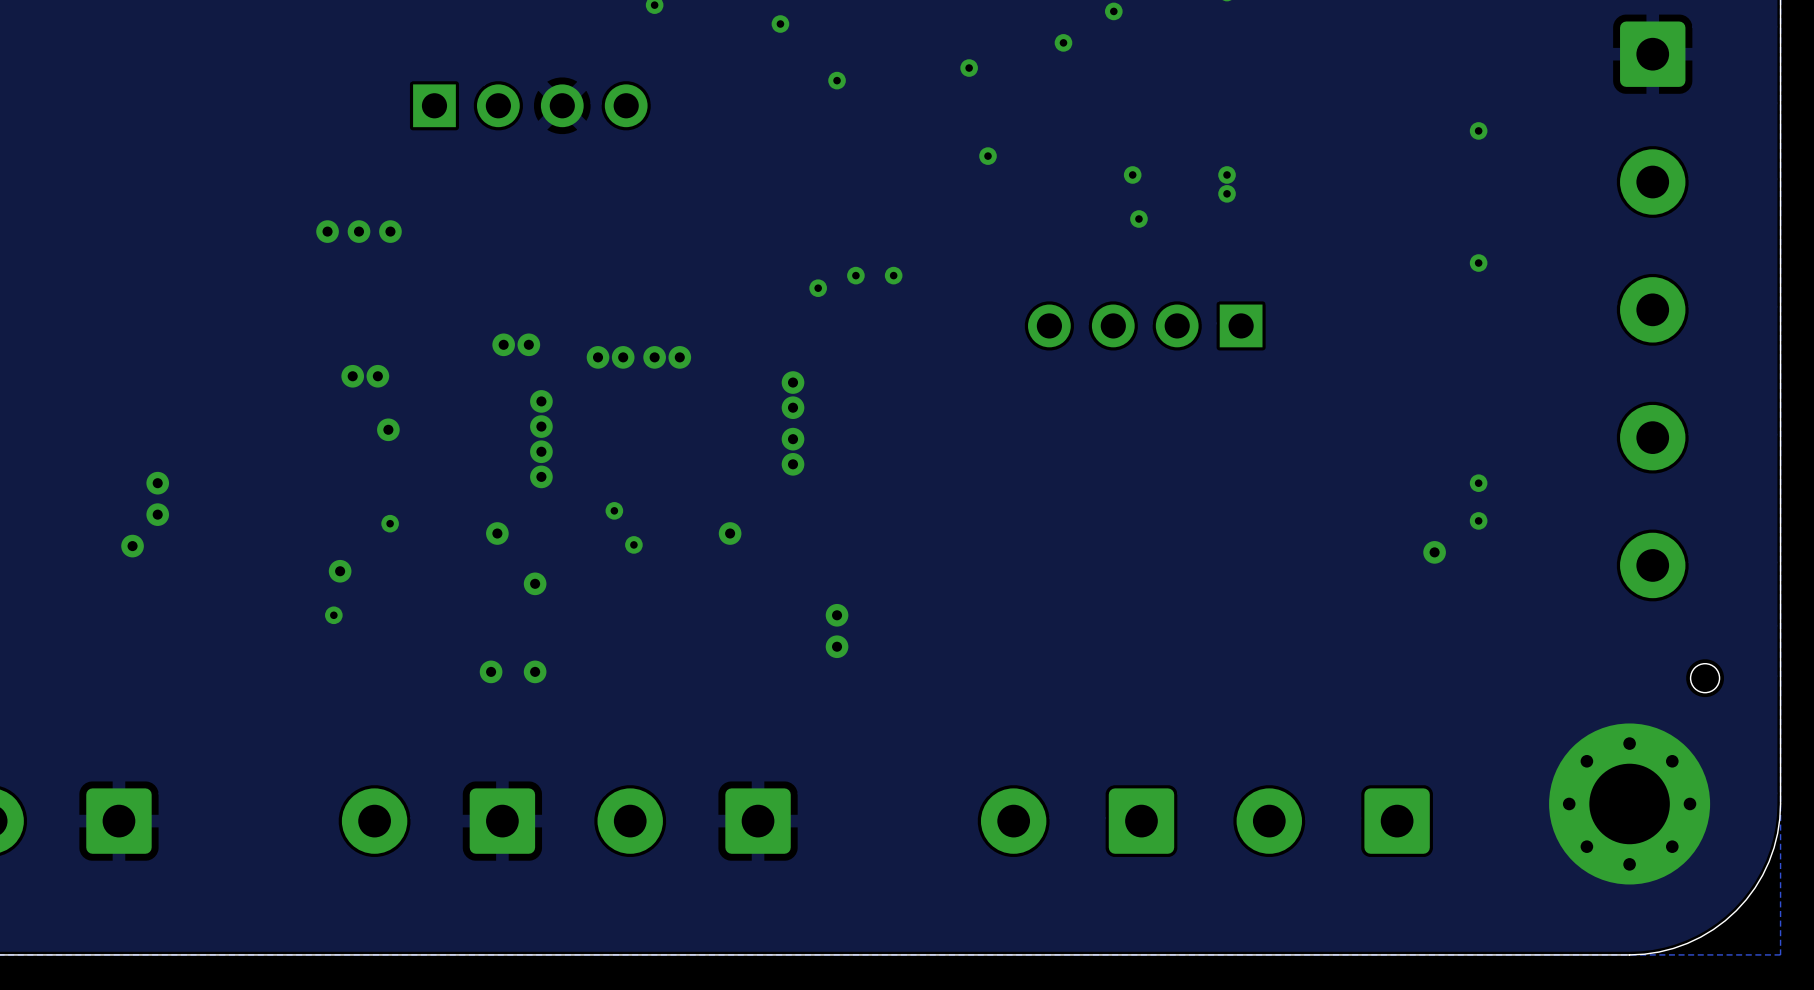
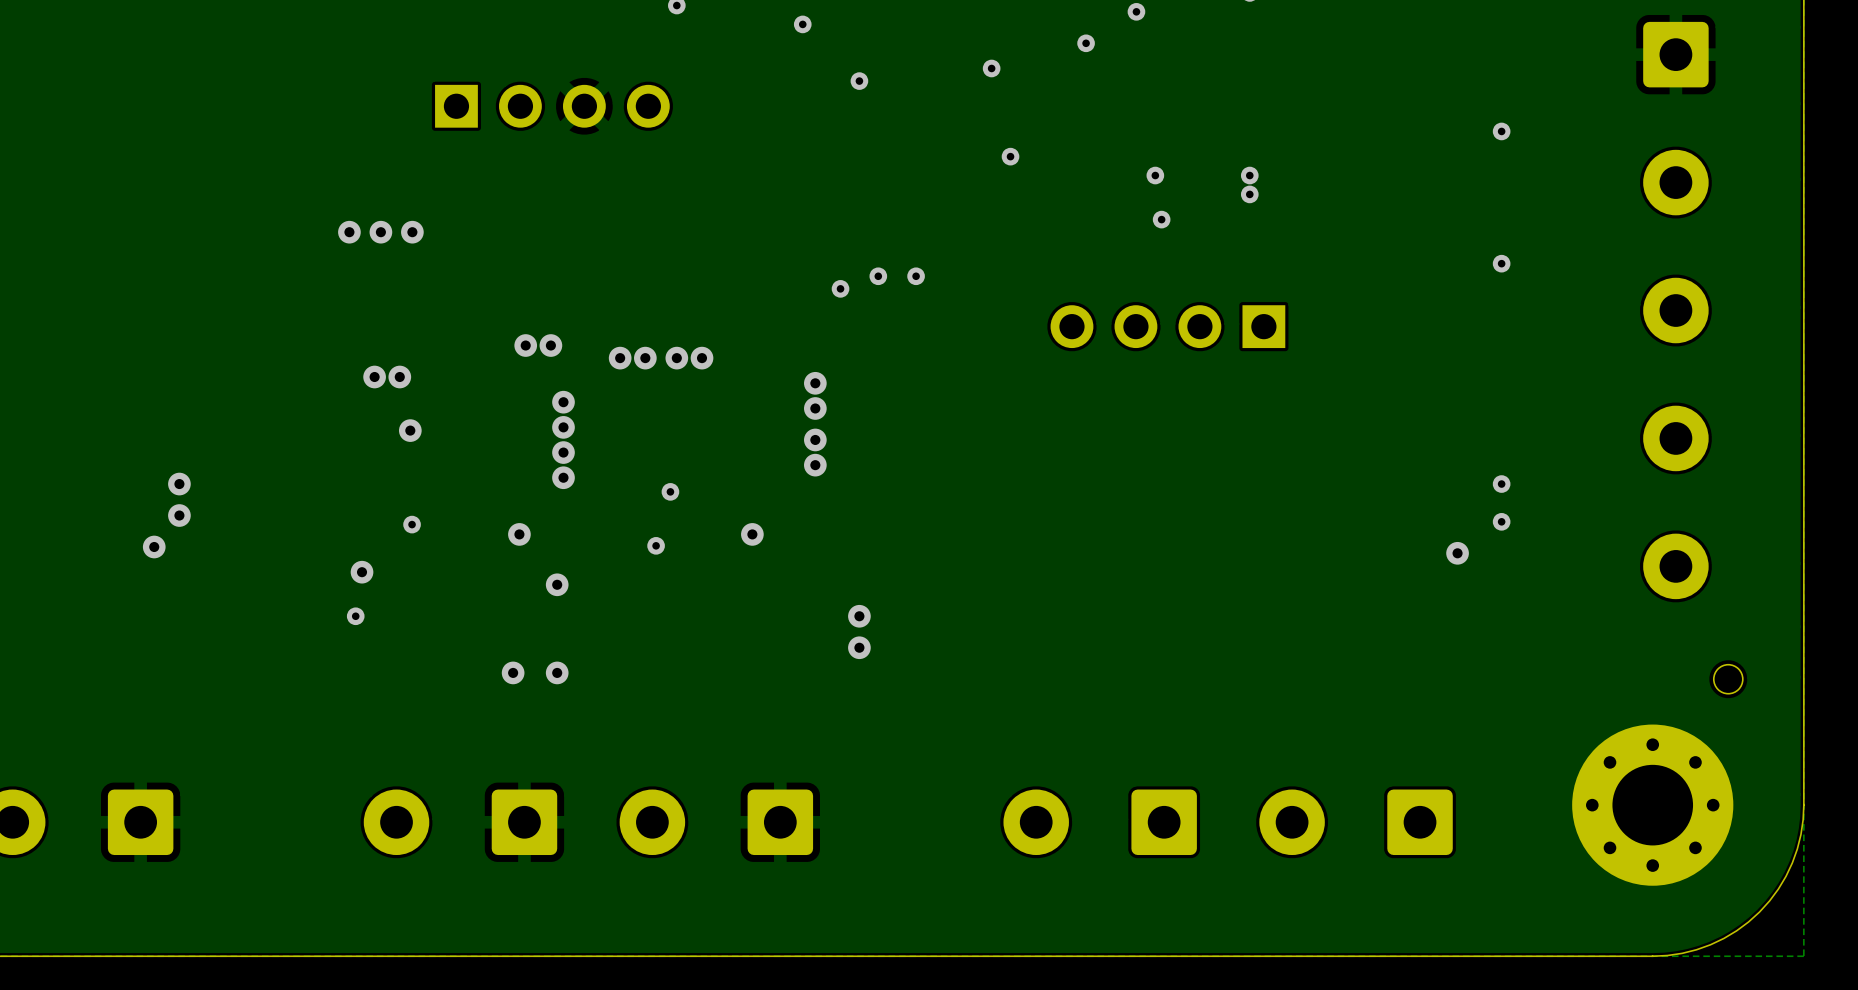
via position: (614, 510) -> (670, 491)

